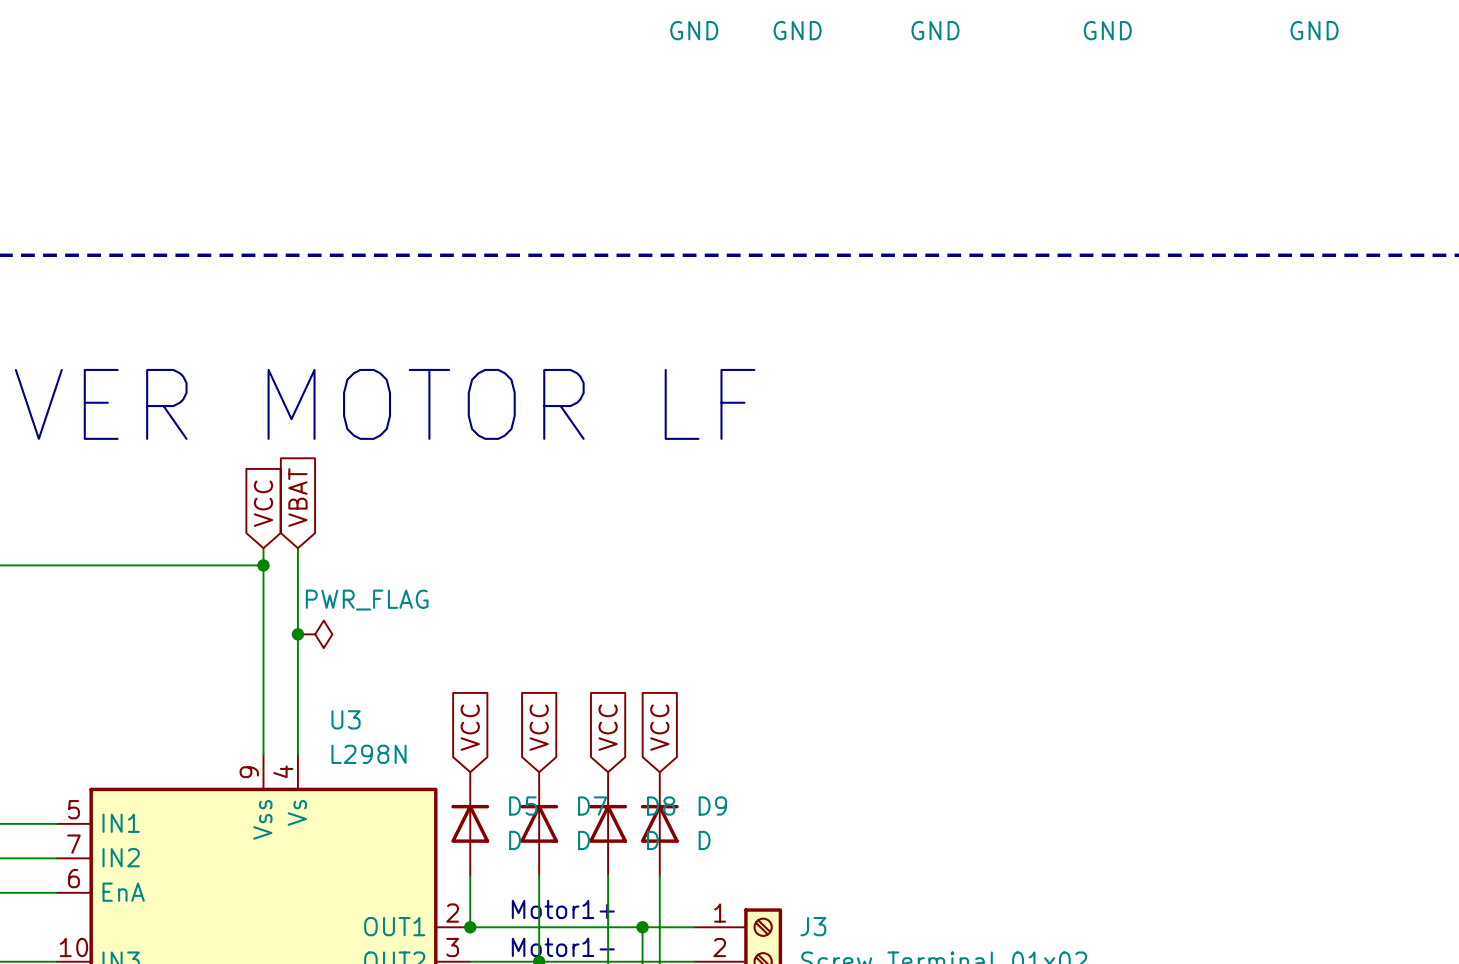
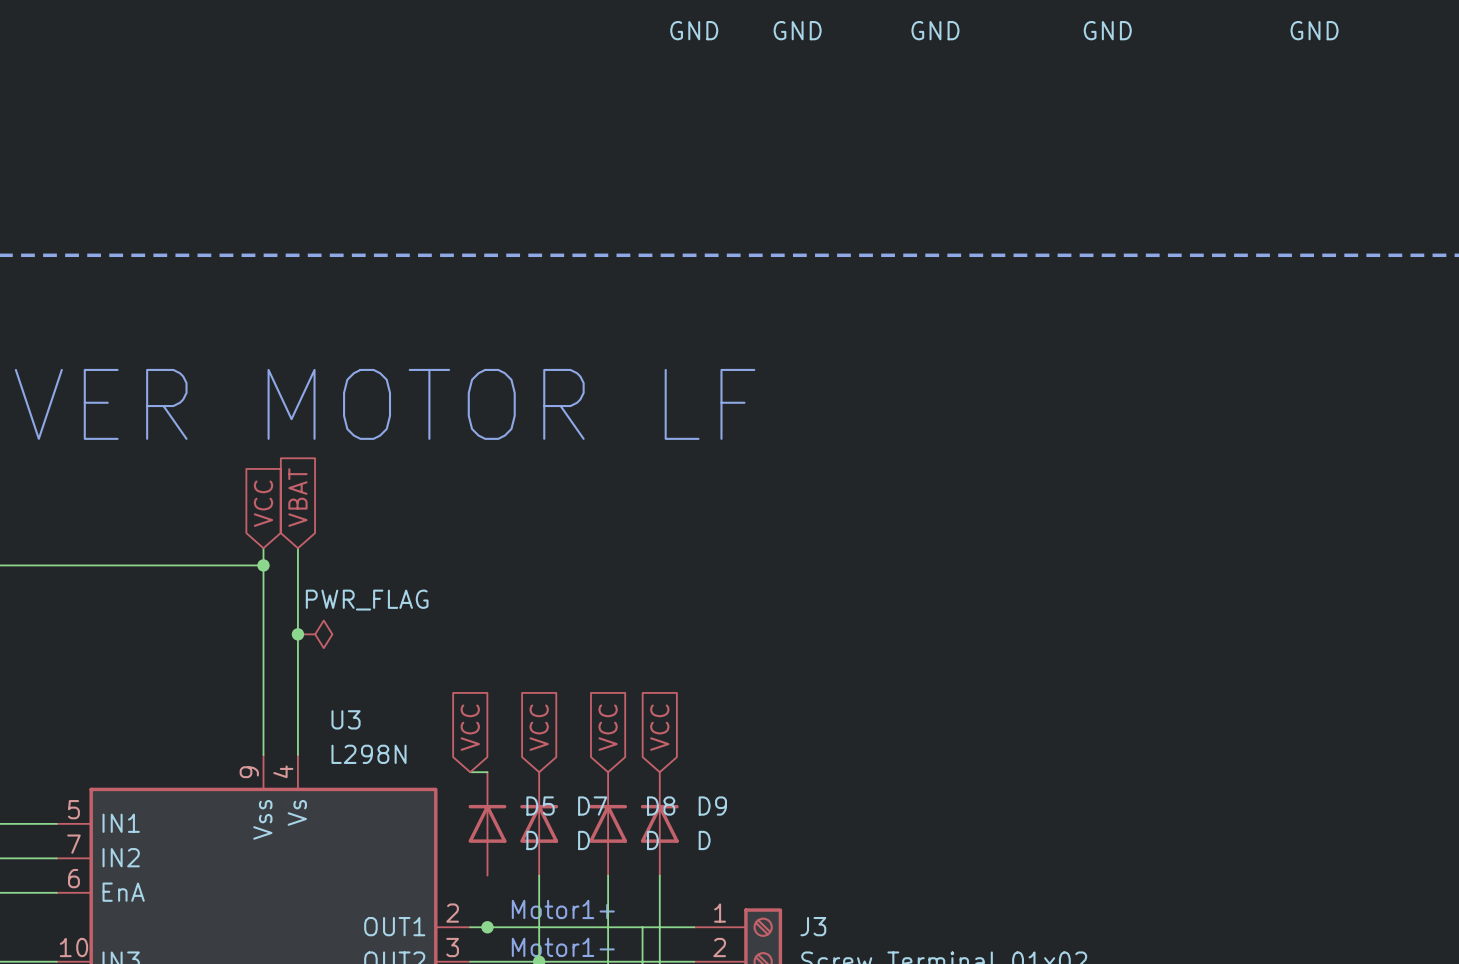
wire: none -> (470, 772) (487, 772)
D5 position: (470, 823) -> (487, 823)
wire: (470, 875) (470, 927) -> none
junction position: (470, 927) -> (487, 927)
junction: (642, 927) -> none

